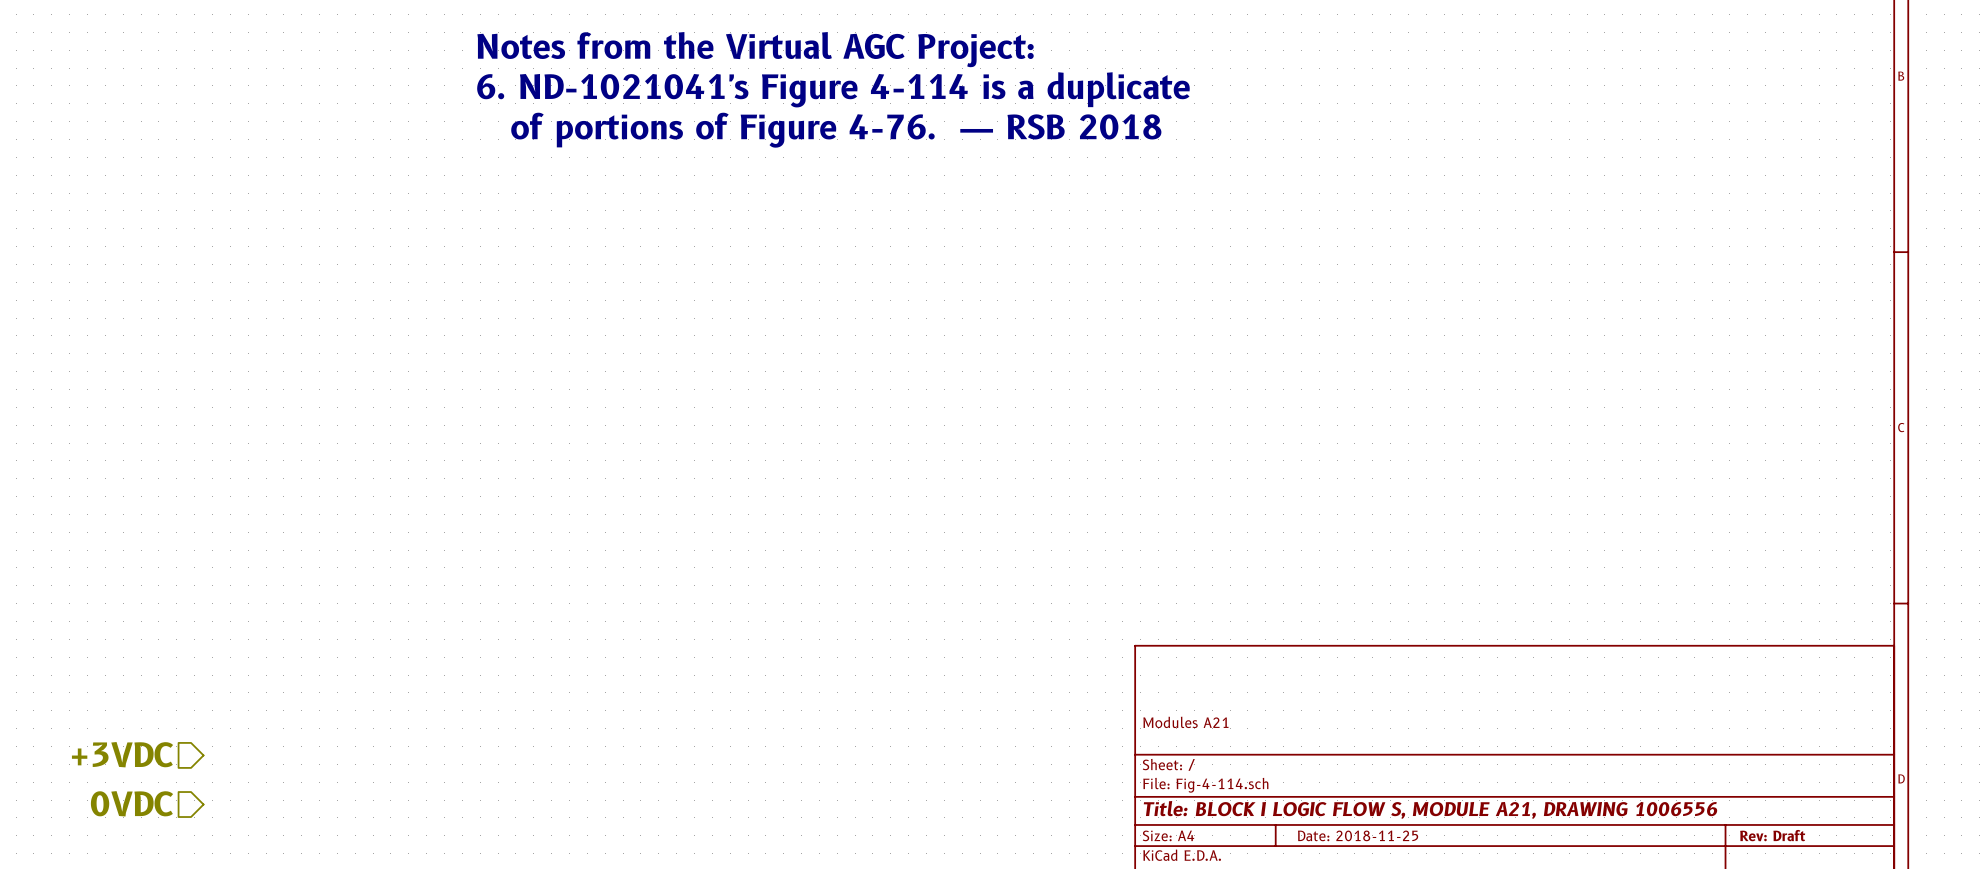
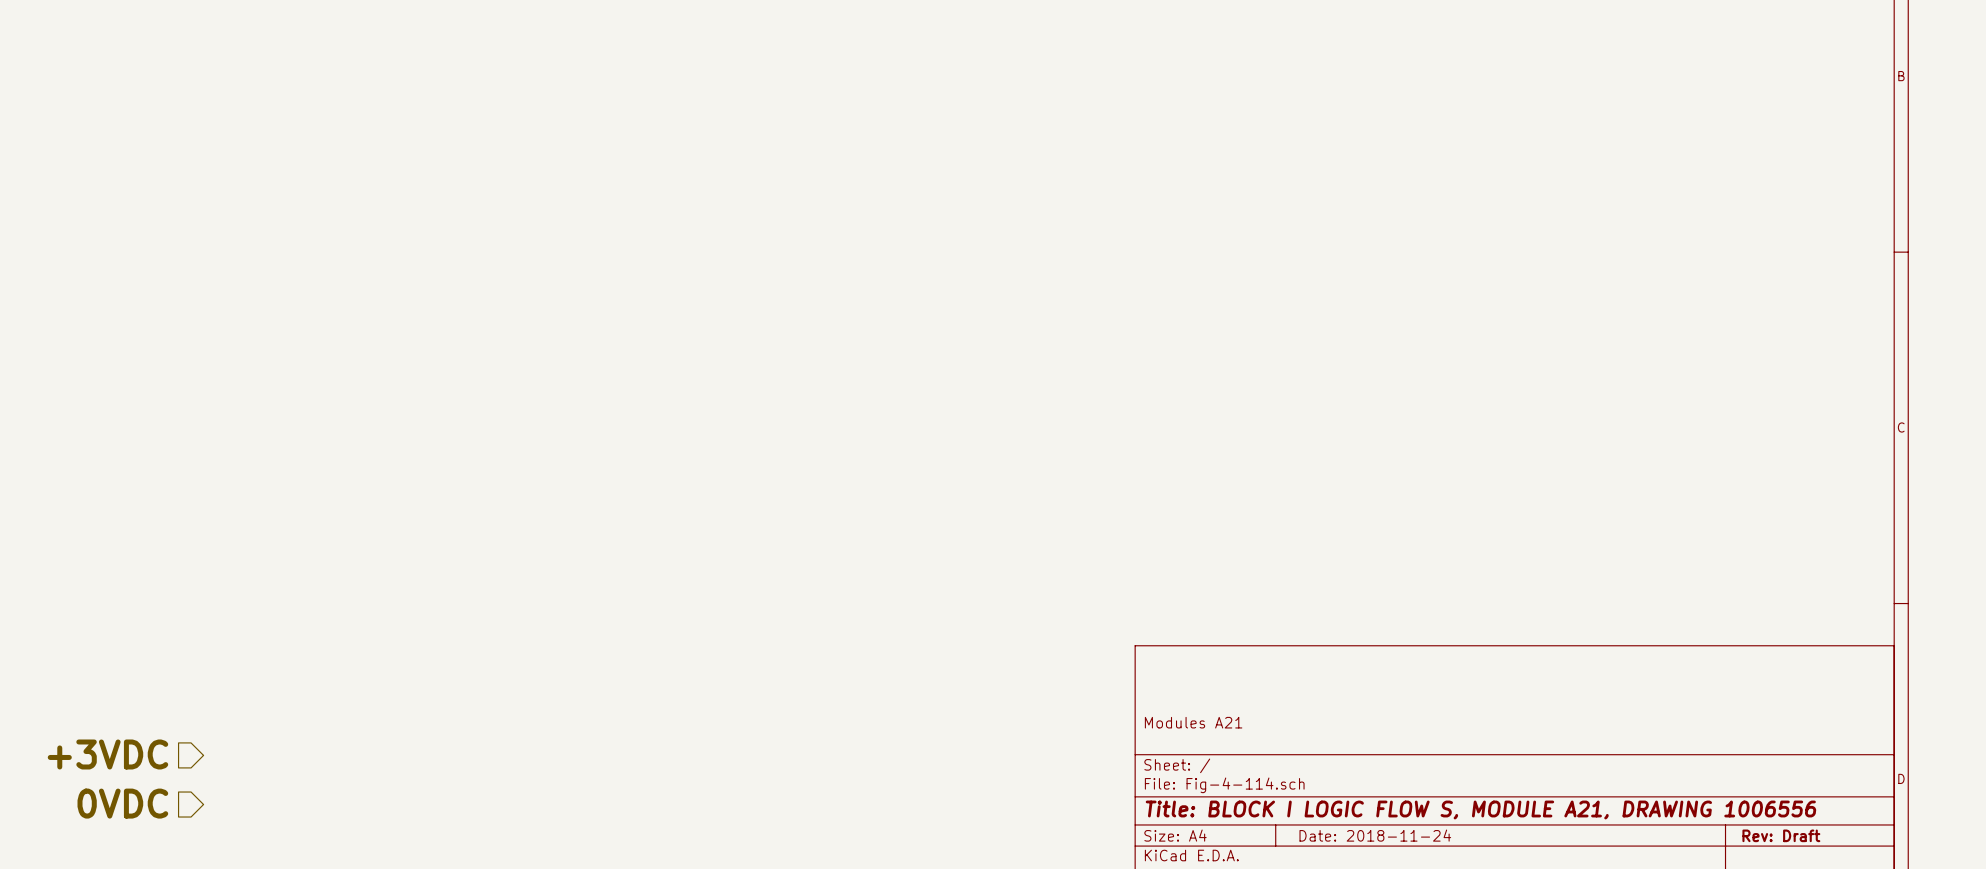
text: Notes from the Virtual AGC Project: (755, 49) -> none
text: 6. ND-1021041's Figure 4-114 is a duplicate (833, 89) -> none
text: of portions of Figure 4-76. — RSB 2018 (836, 130) -> none
title block: Date: 2018-11-25 (1358, 835) -> Date: 2018-11-24 (1375, 835)

